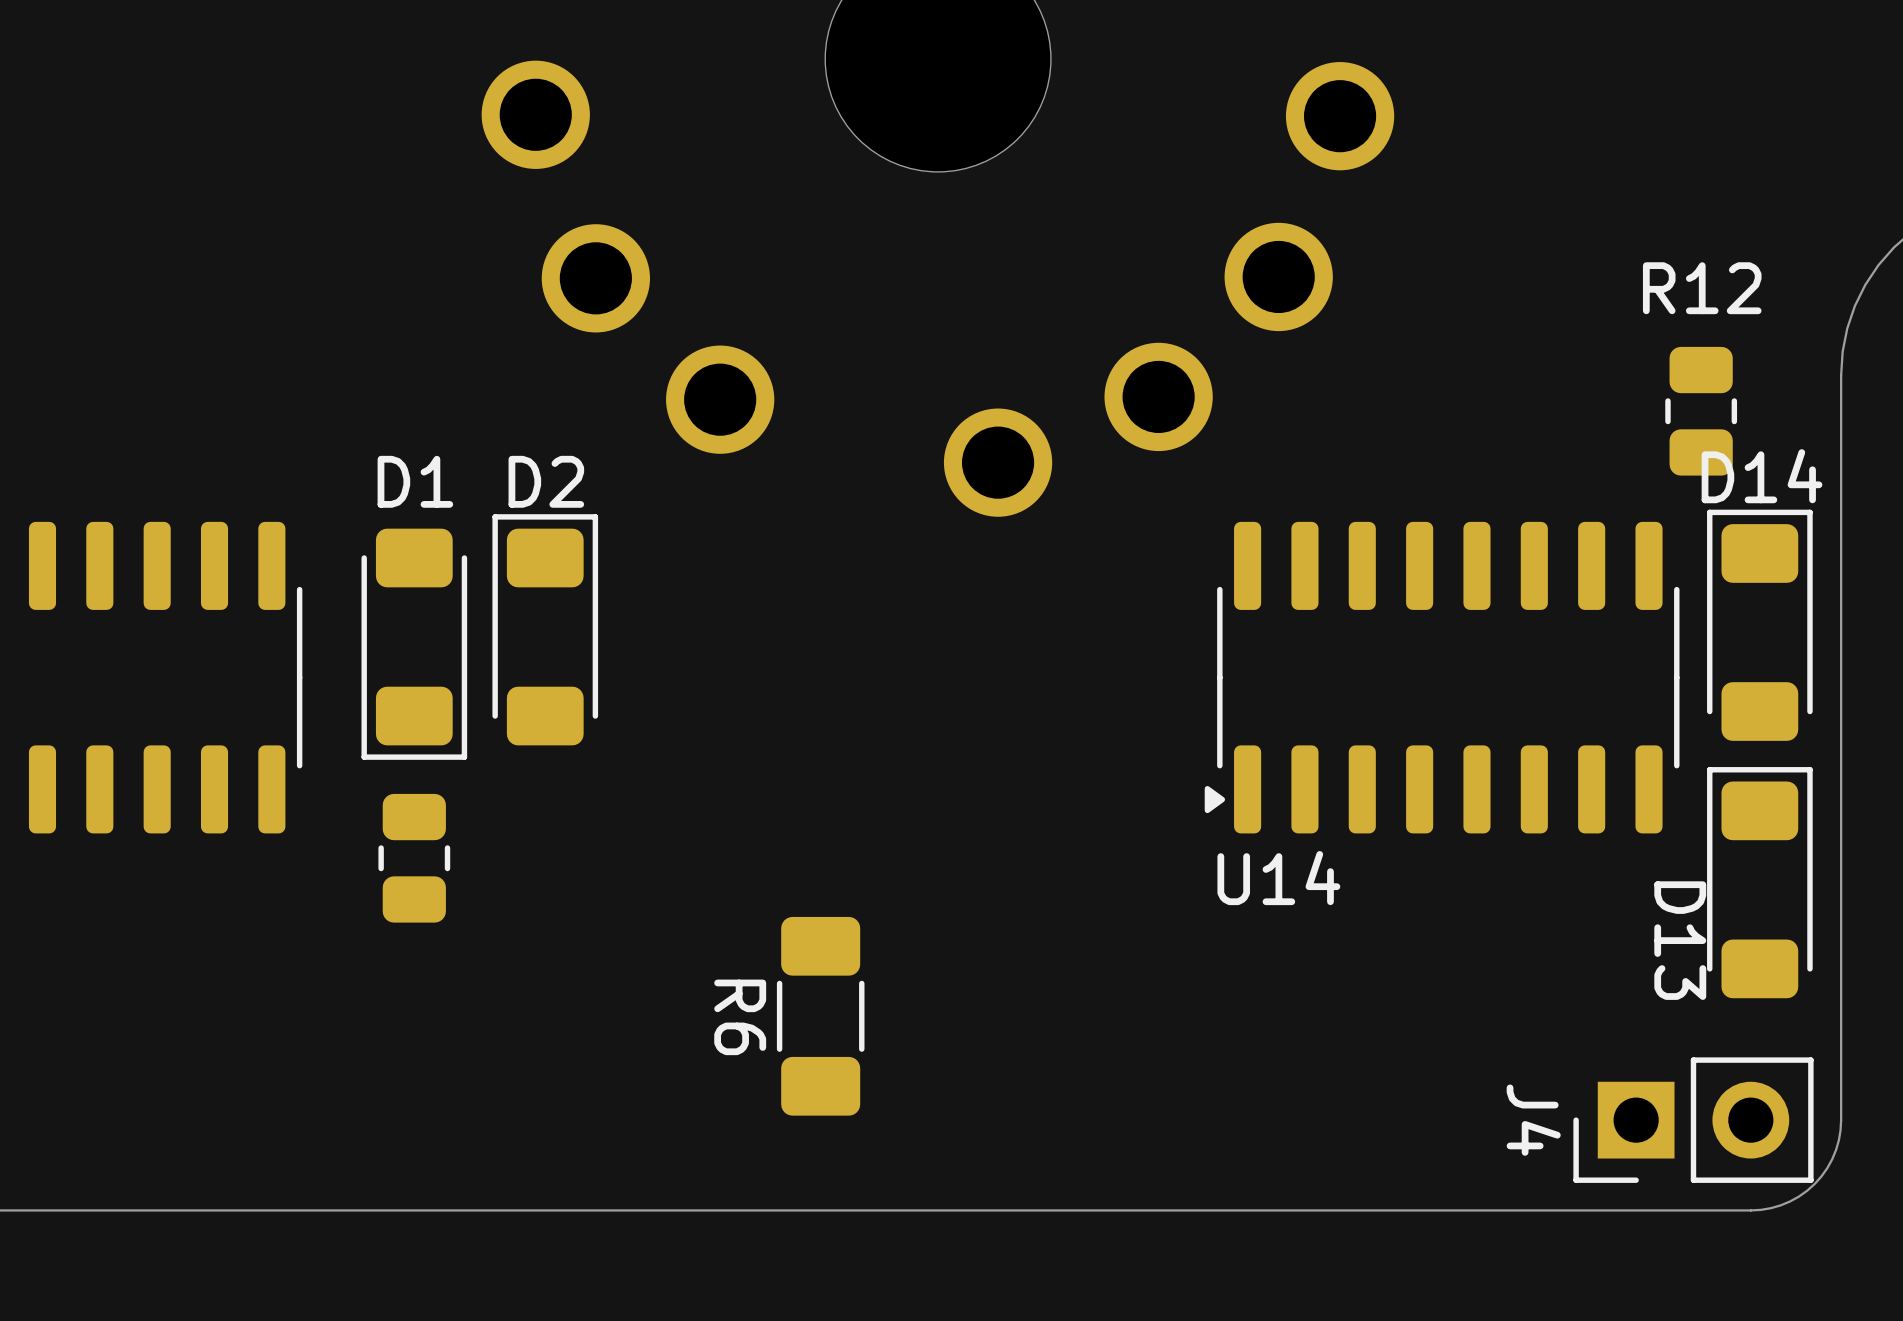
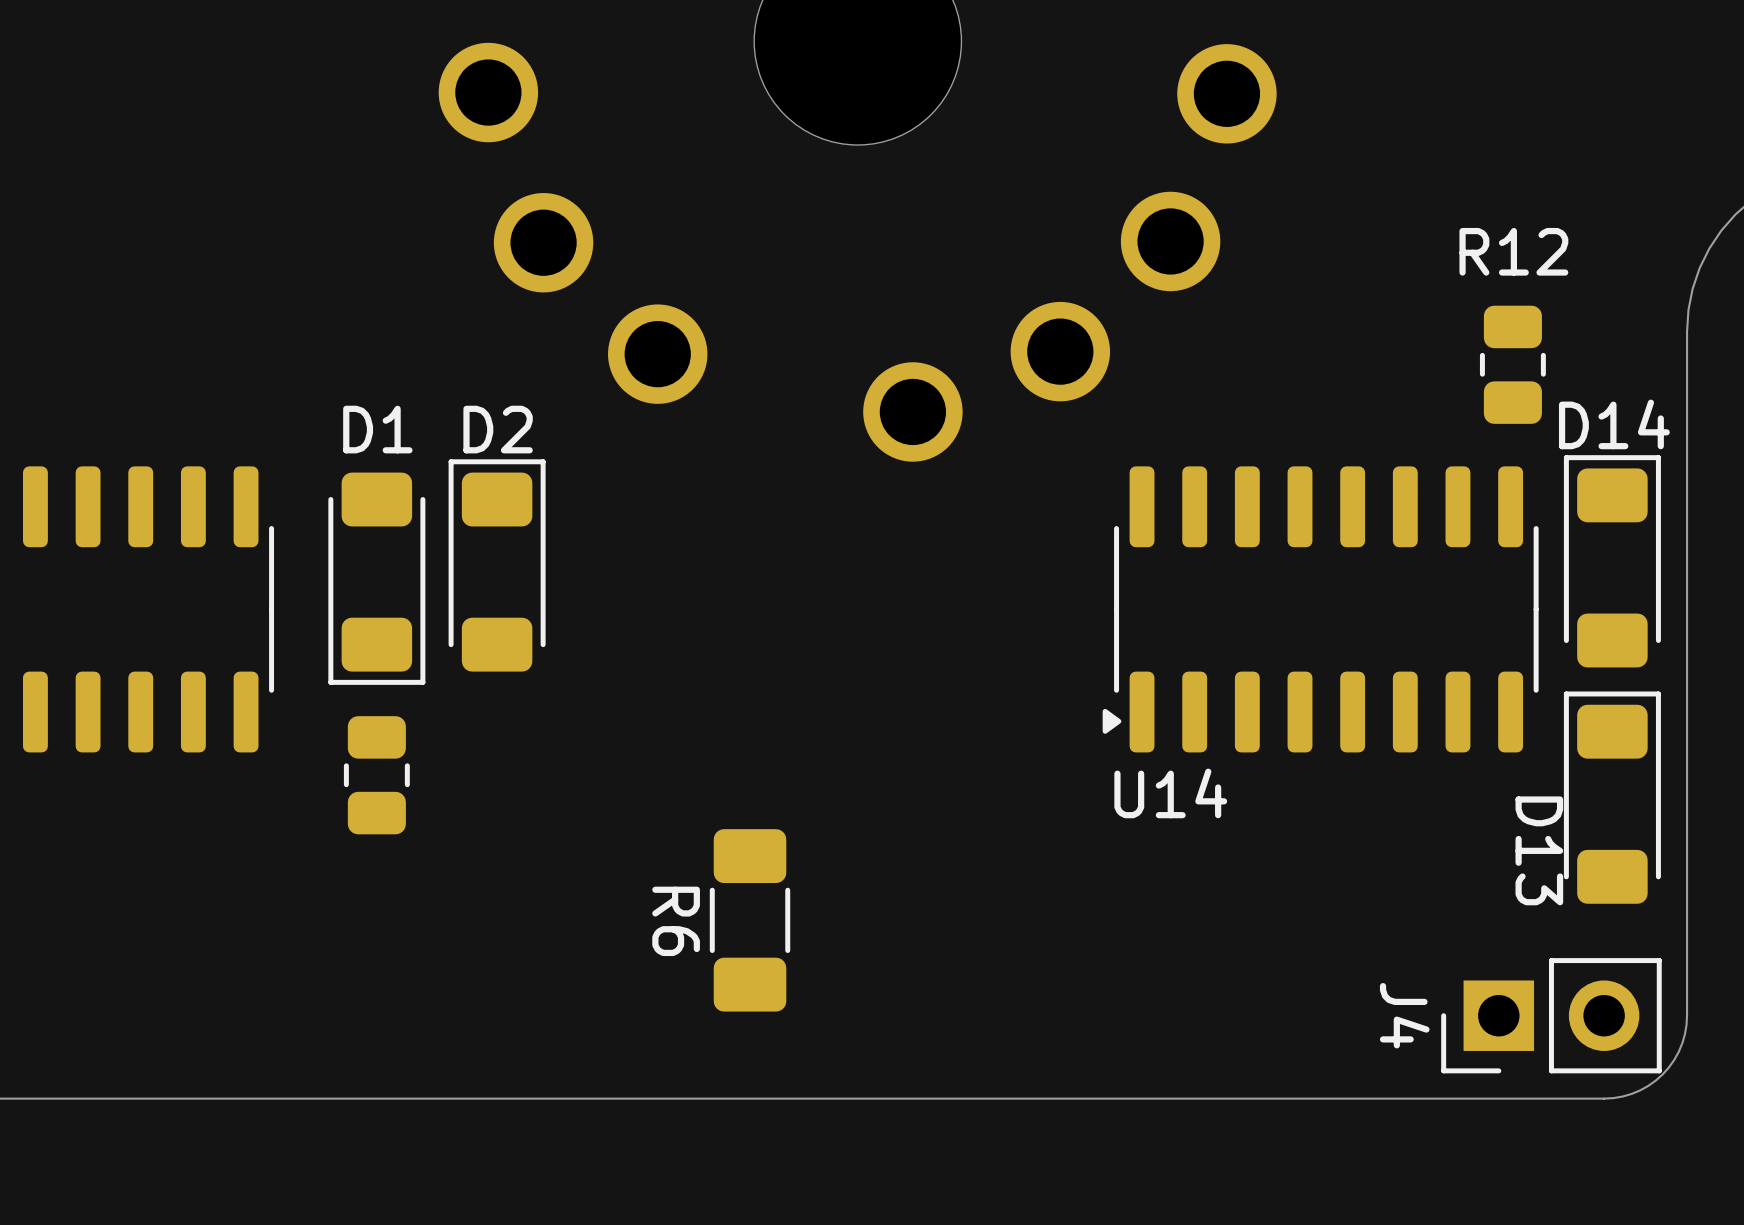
R12 position: (1701, 411) -> (1512, 364)

